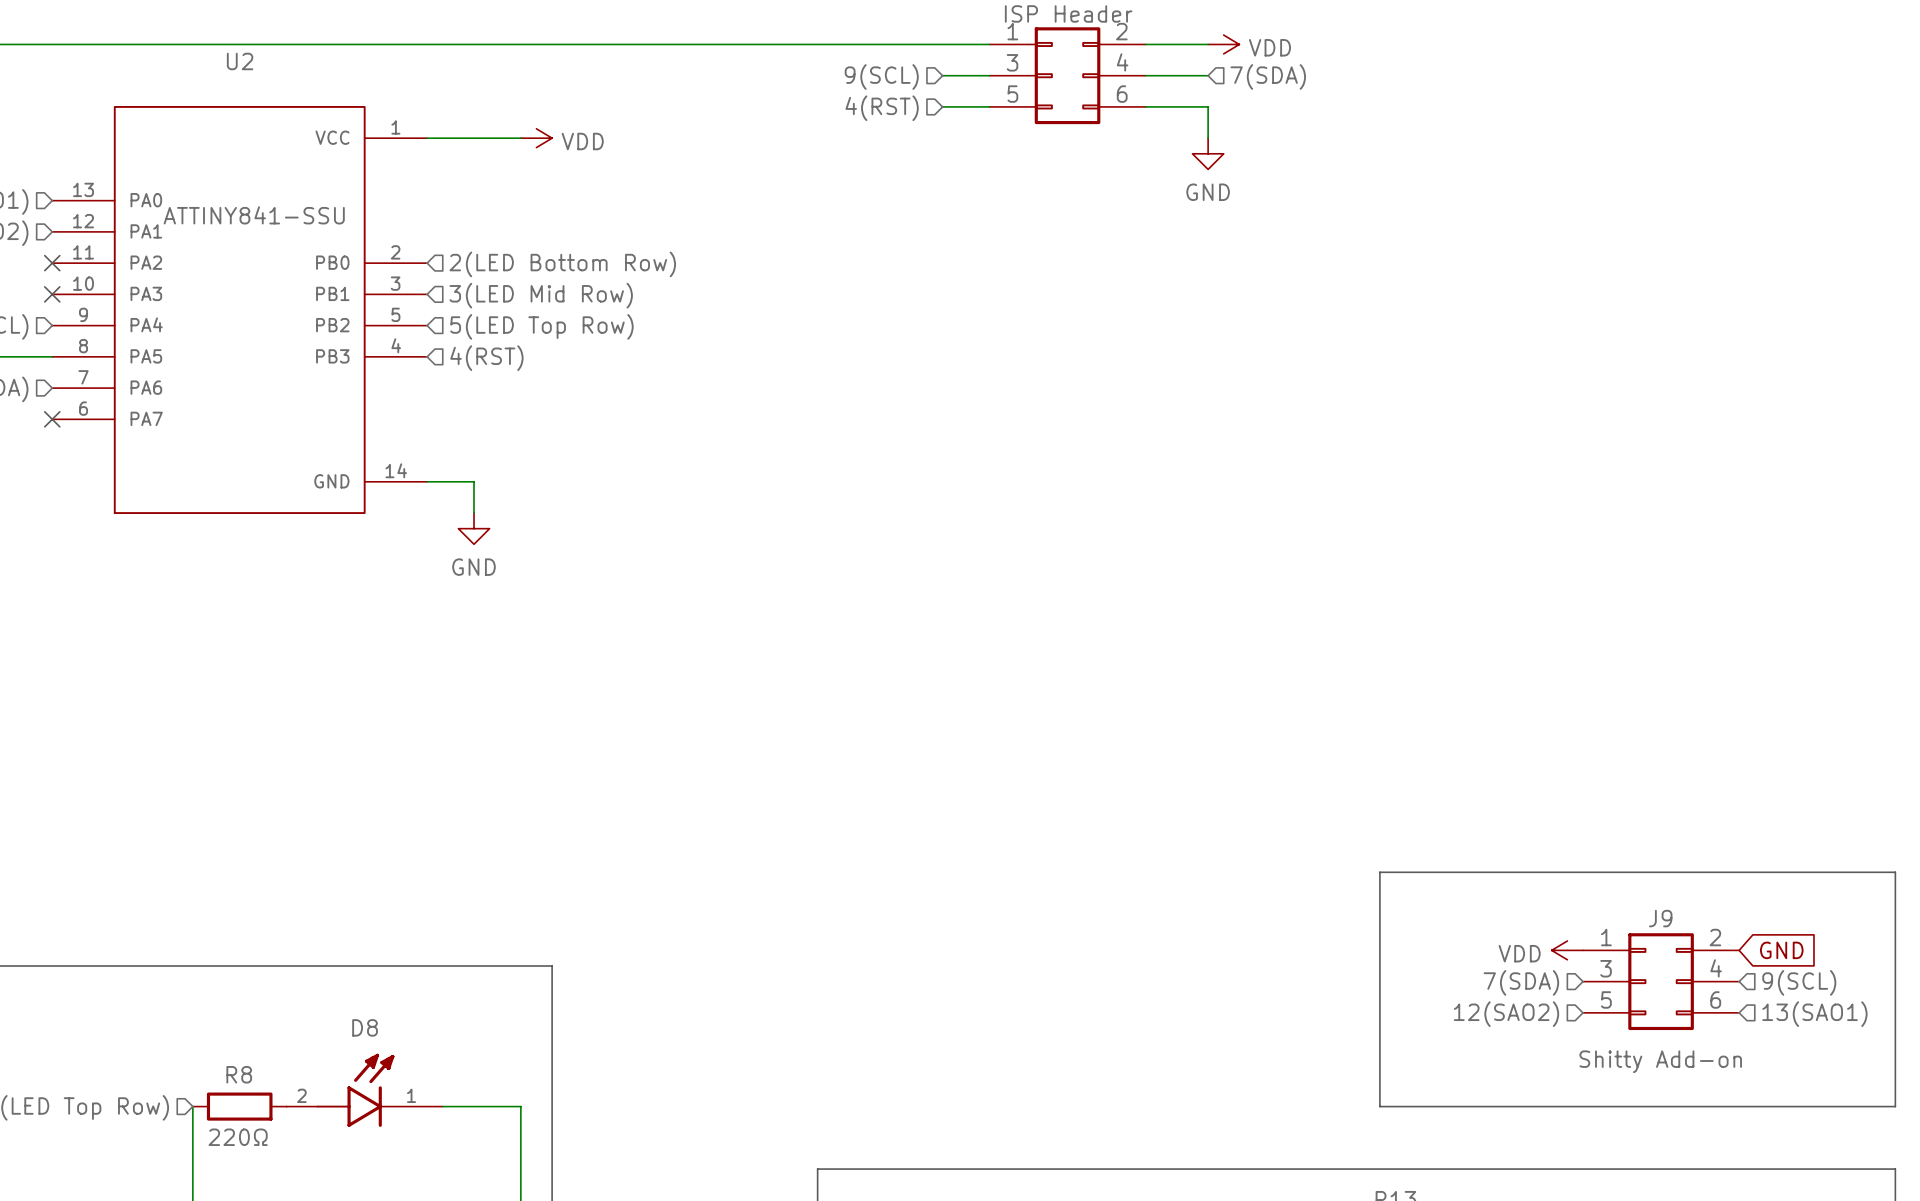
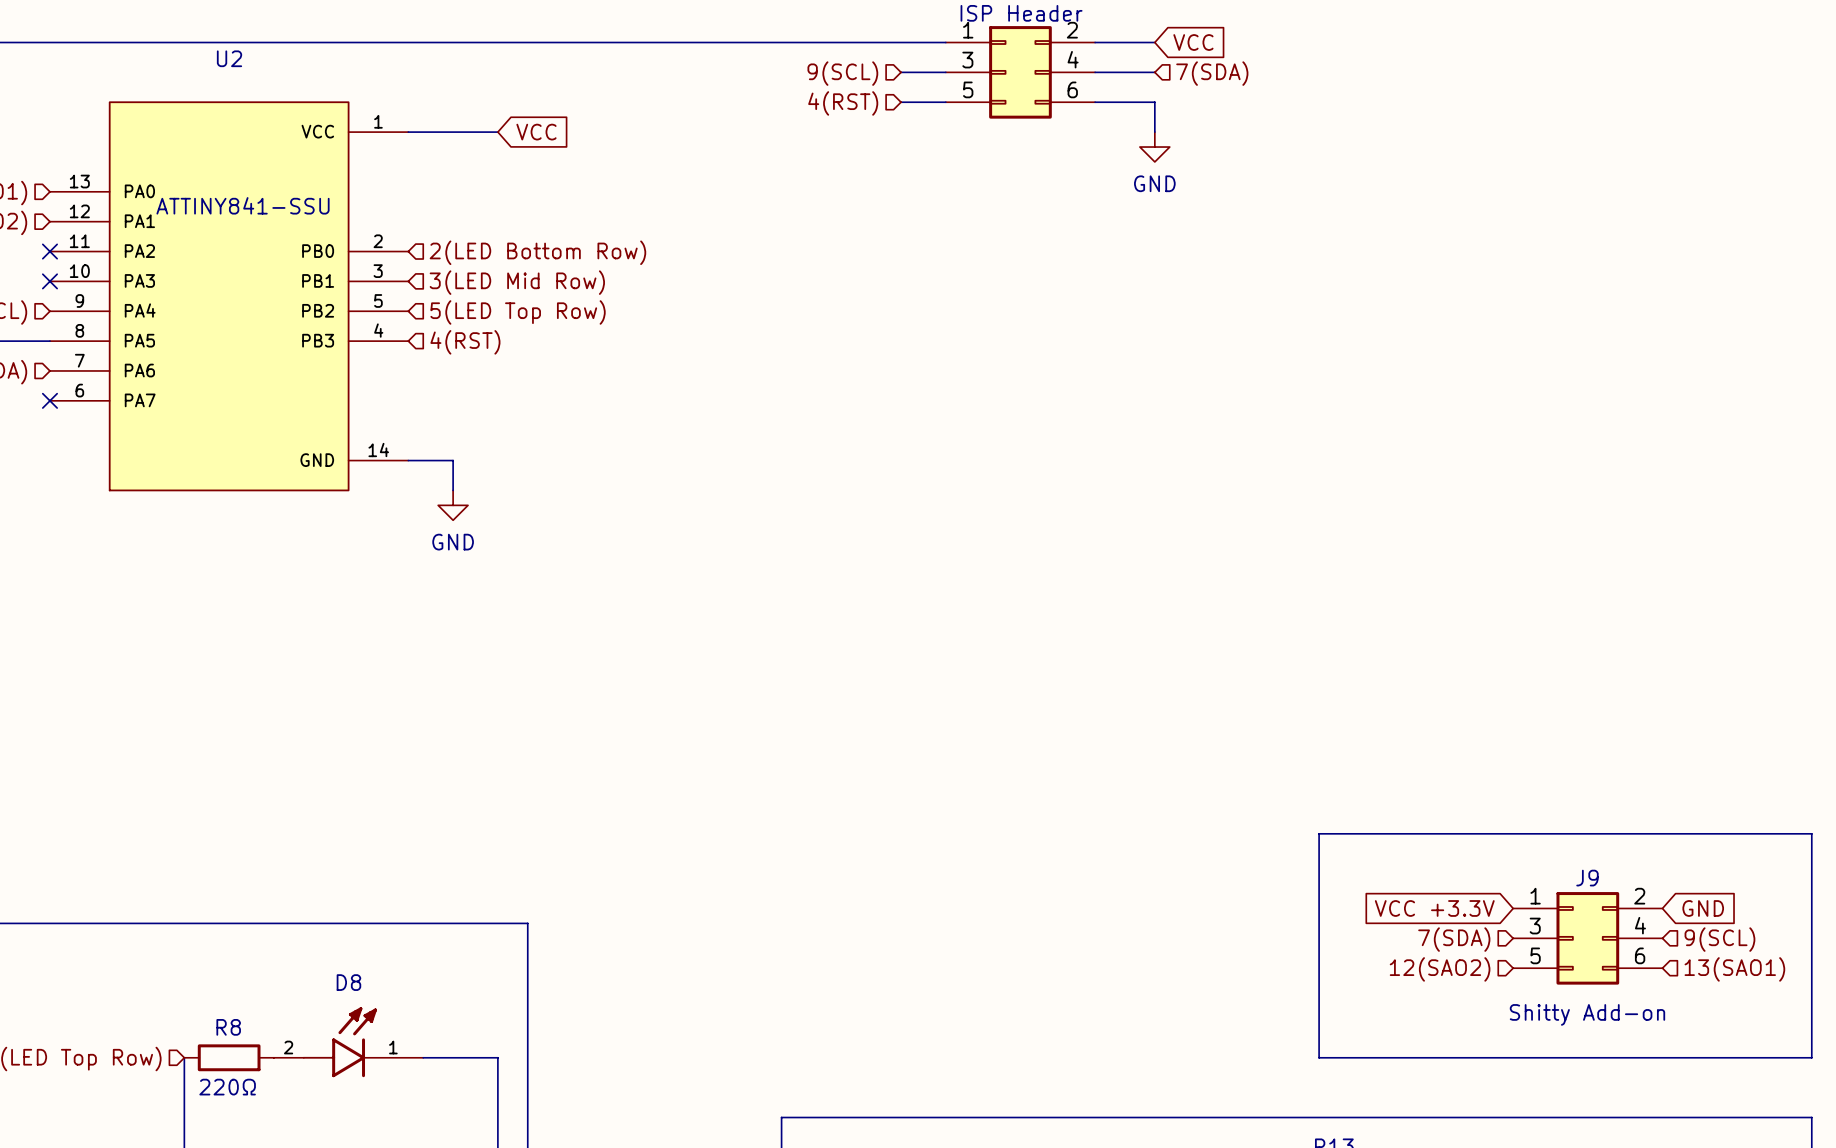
power symbol: VDD (1223, 44) -> none
global label: none -> VCC (1193, 42)
power symbol: VDD (536, 138) -> none
global label: none -> VCC (536, 132)
global label: none -> VCC +3.3V (1434, 908)
power symbol: VDD (1567, 950) -> none

